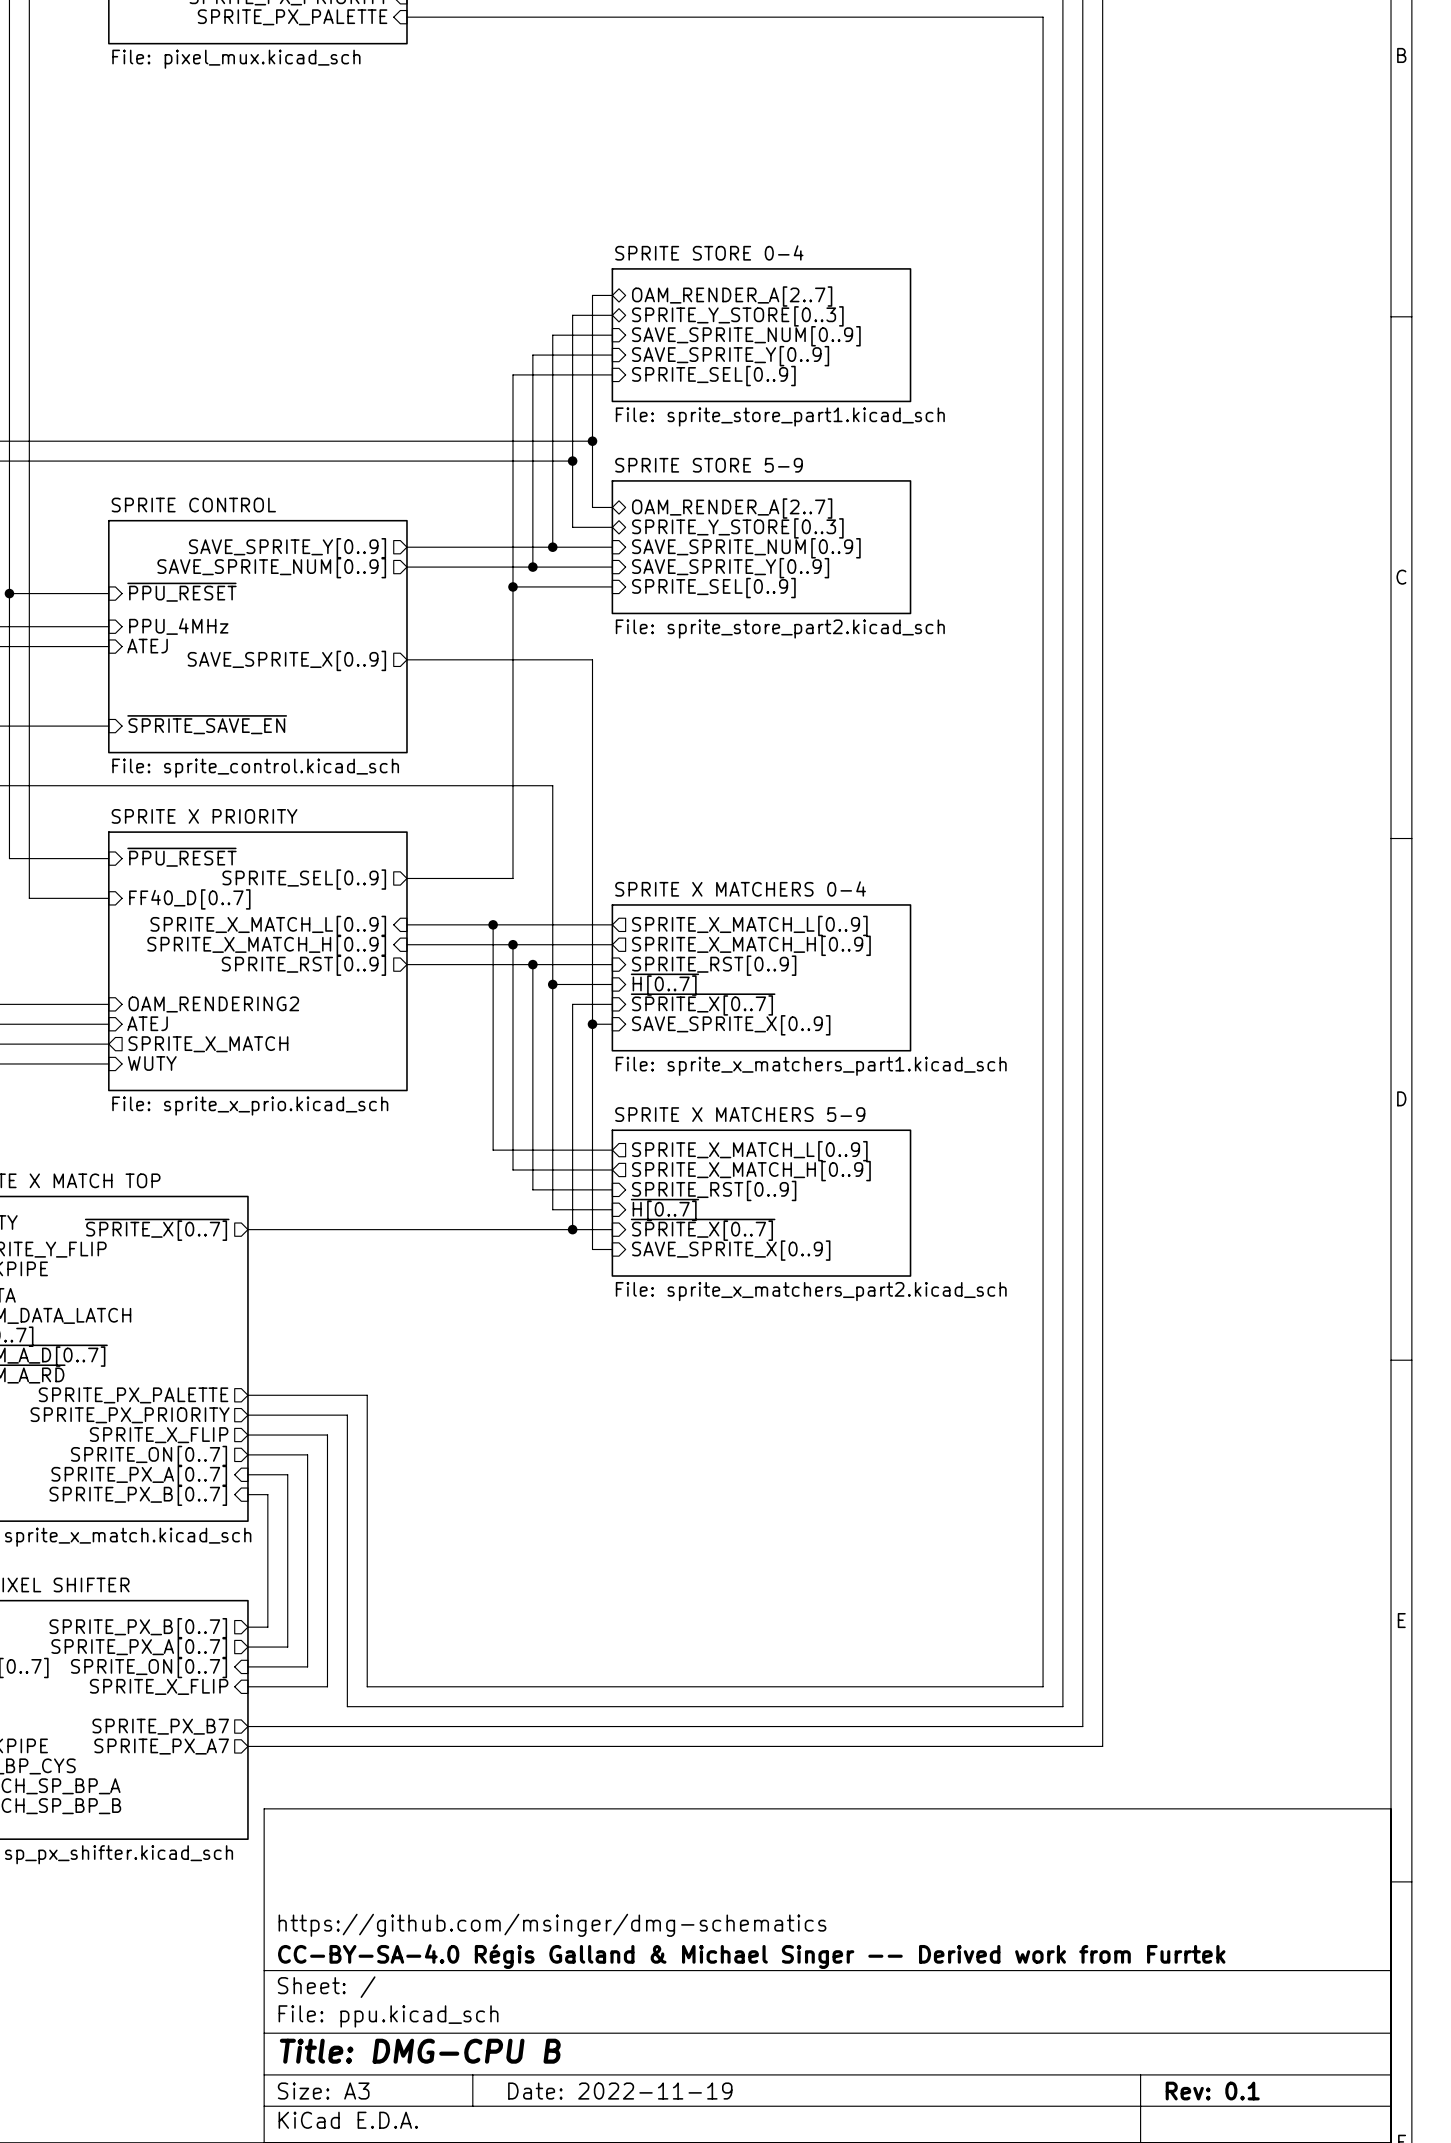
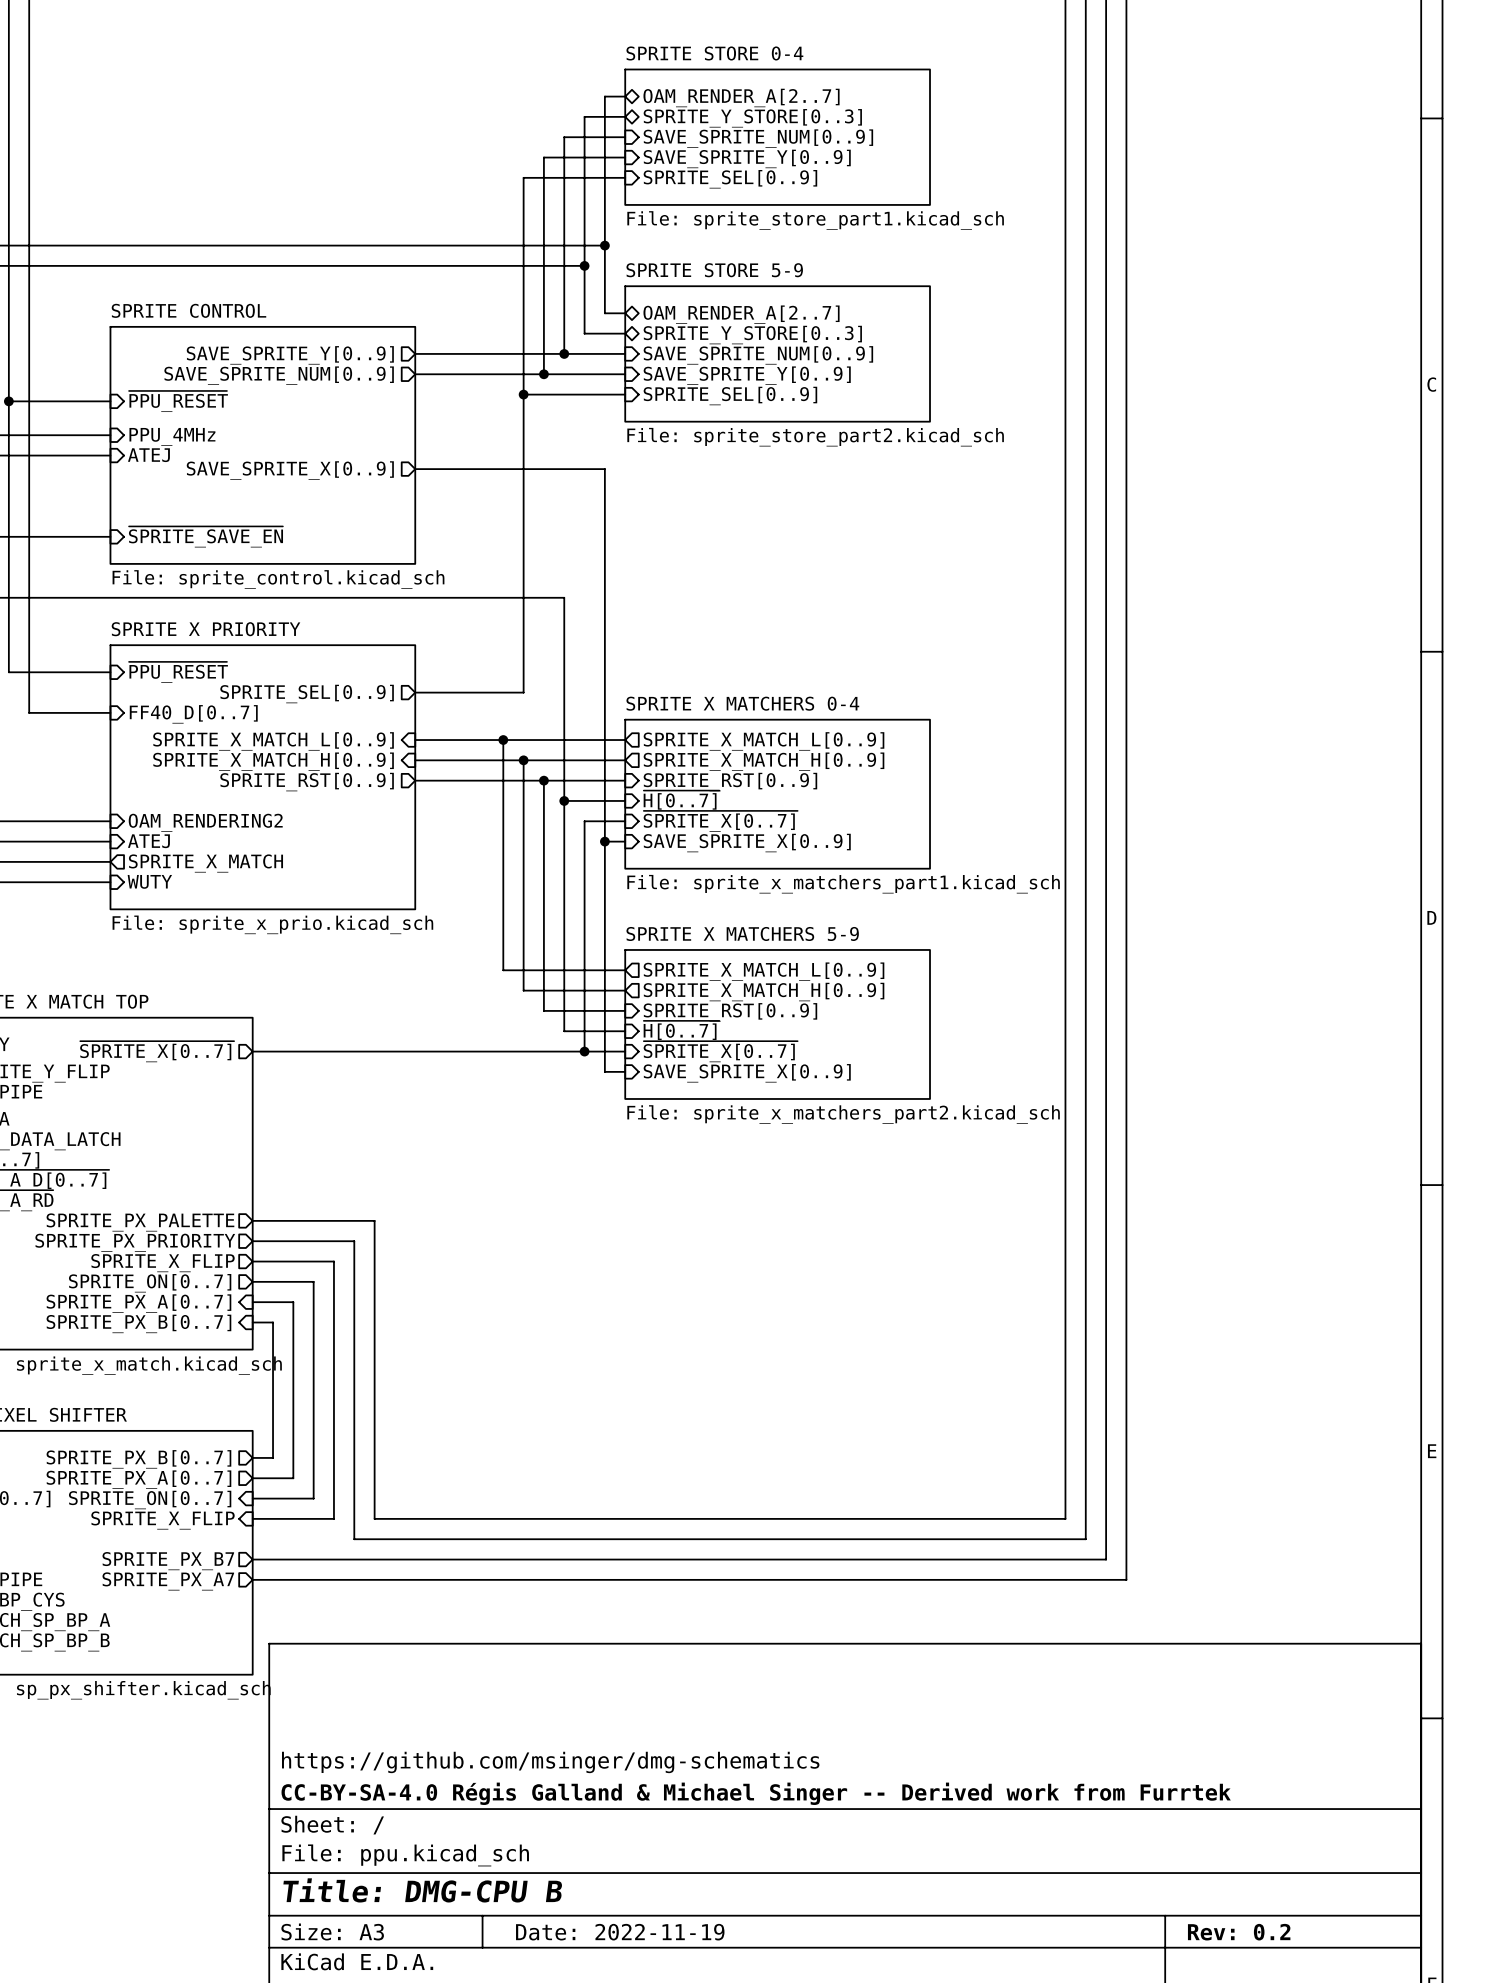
title block: Rev: 0.1 (1212, 2091) -> Rev: 0.2 (1239, 1932)

